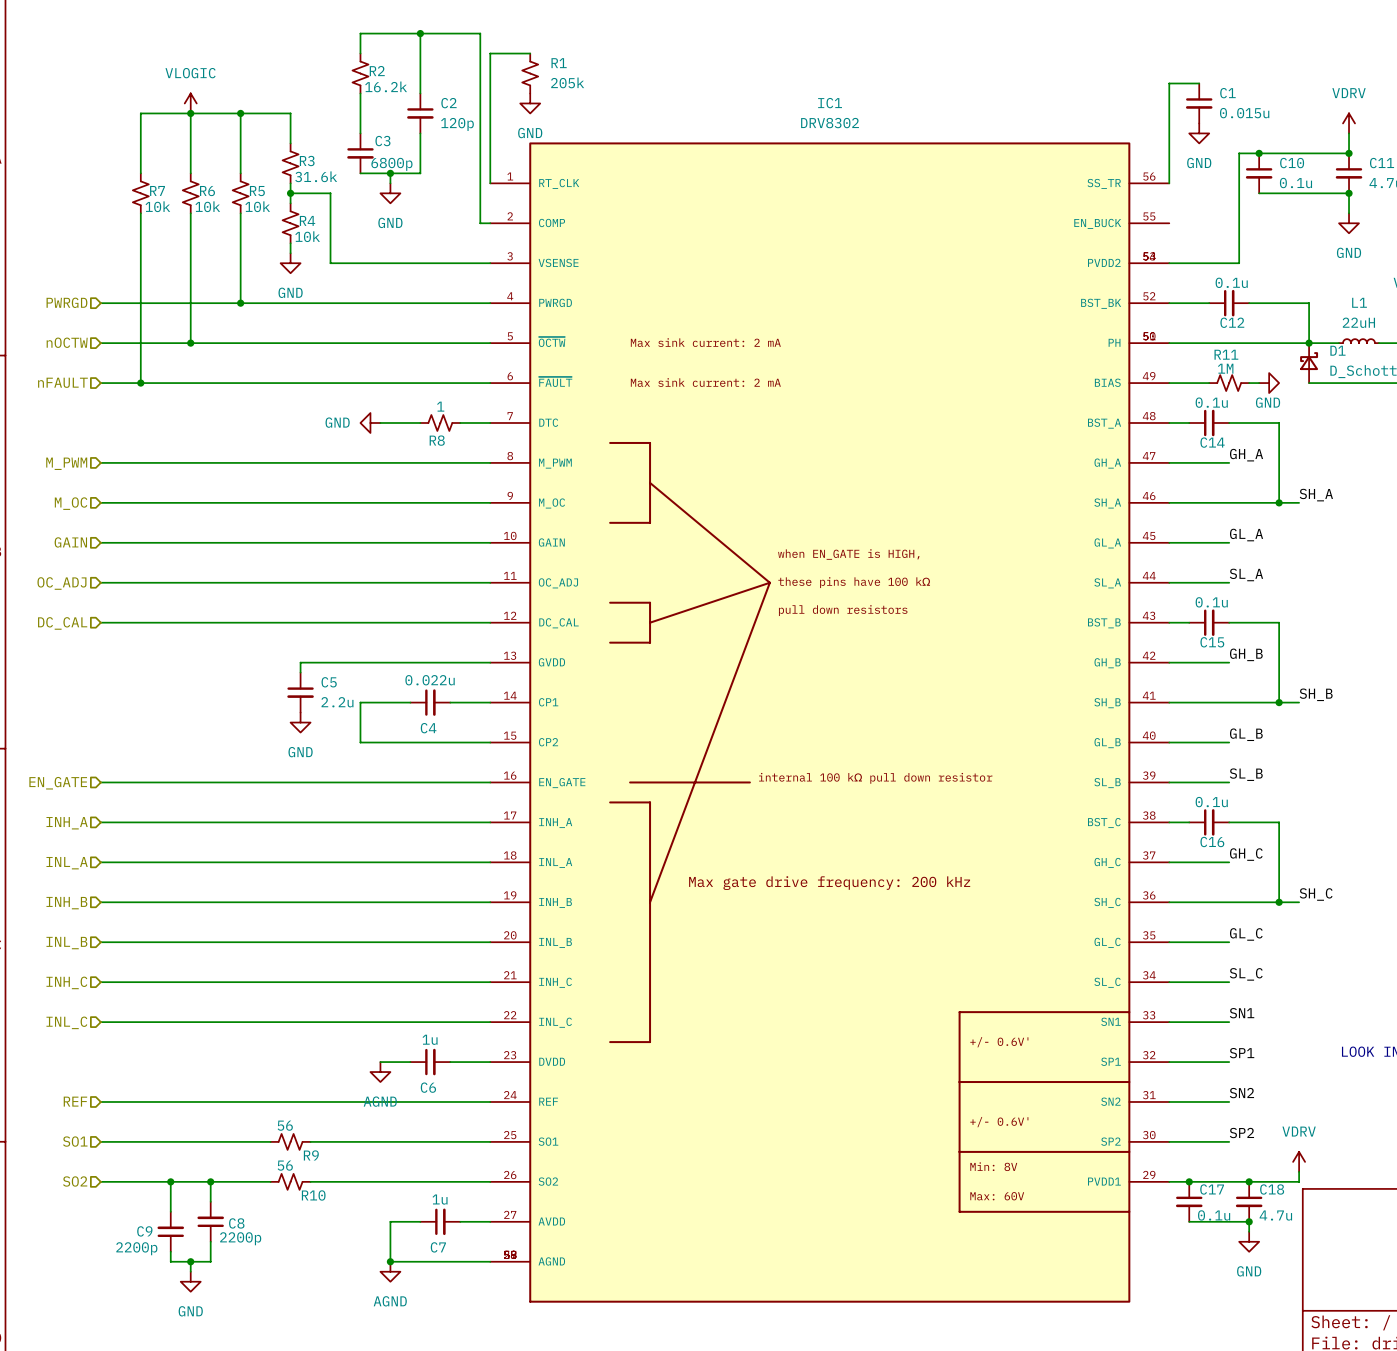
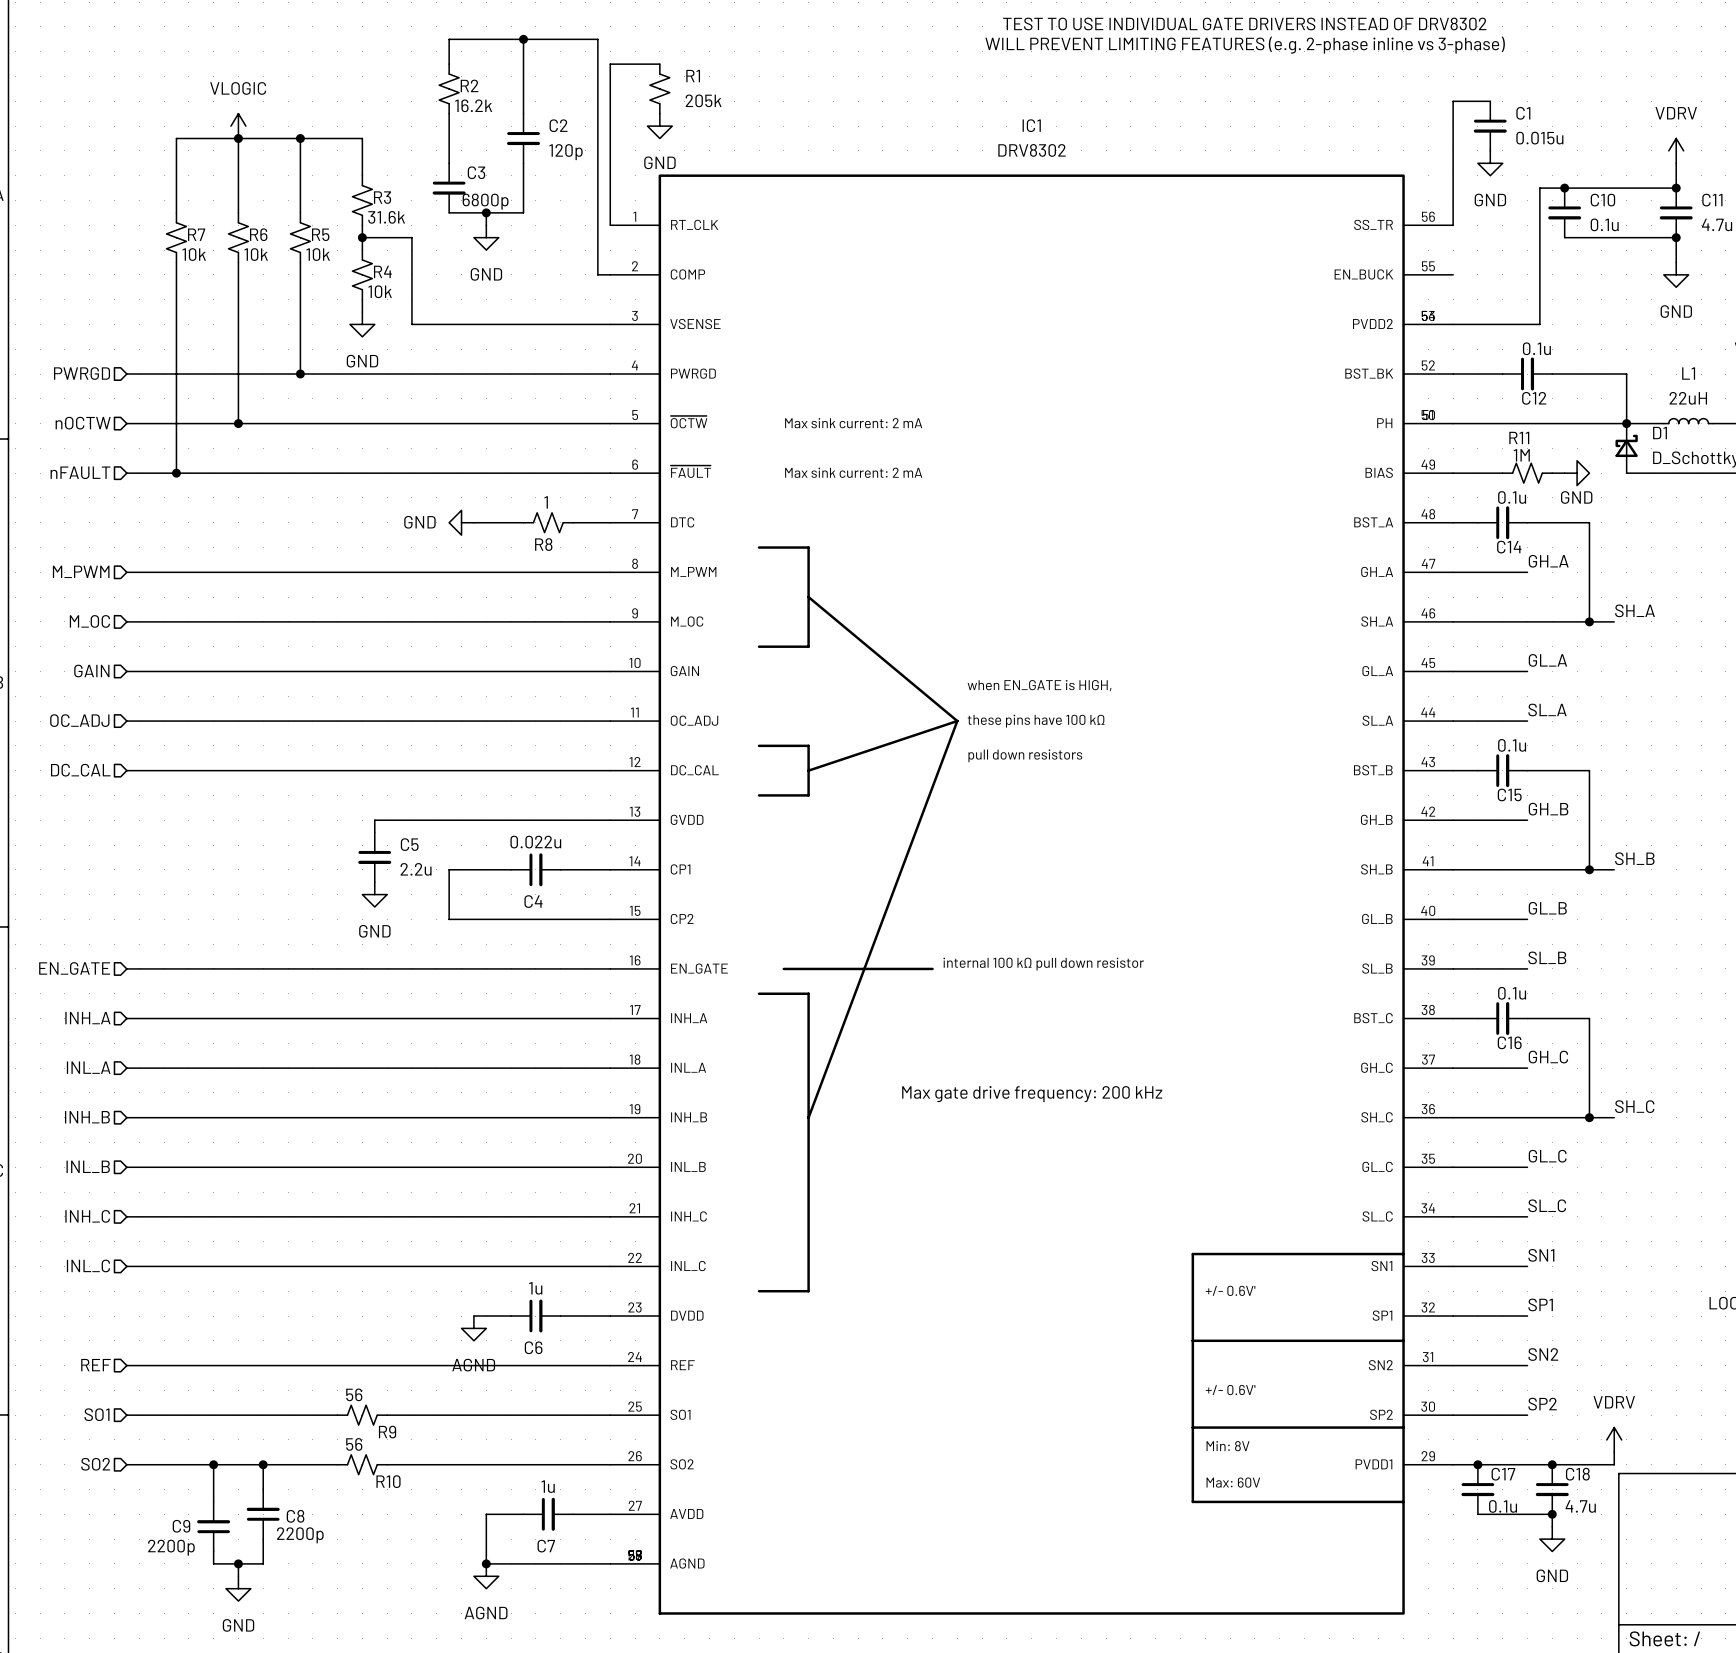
text: none -> TEST TO USE INDIVIDUAL GATE DRIVERS INSTEAD OF DRV8302 (1244, 23)
text: none -> WILL PREVENT LIMITING FEATURES (e.g. 2-phase inline vs 3-phase) (1245, 45)

